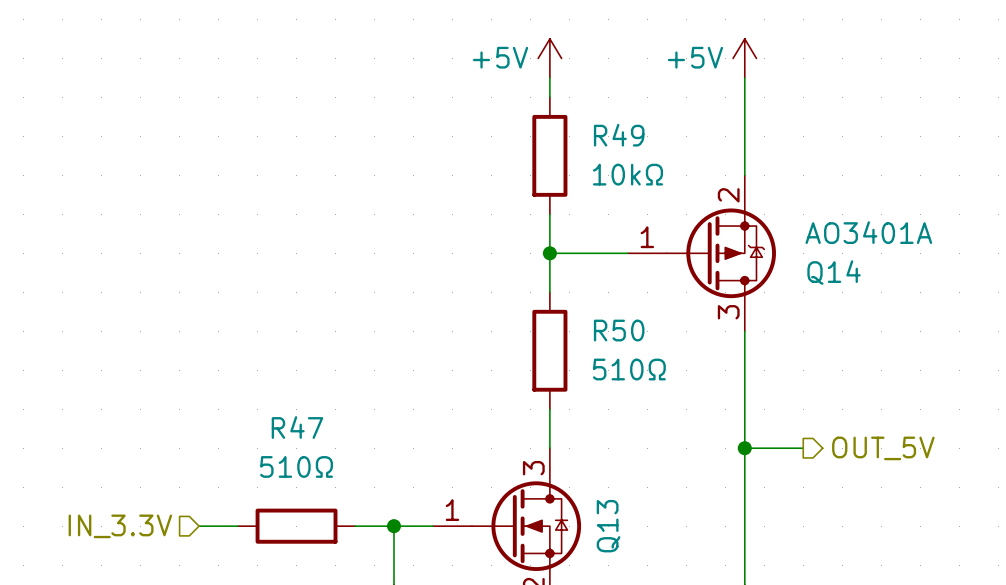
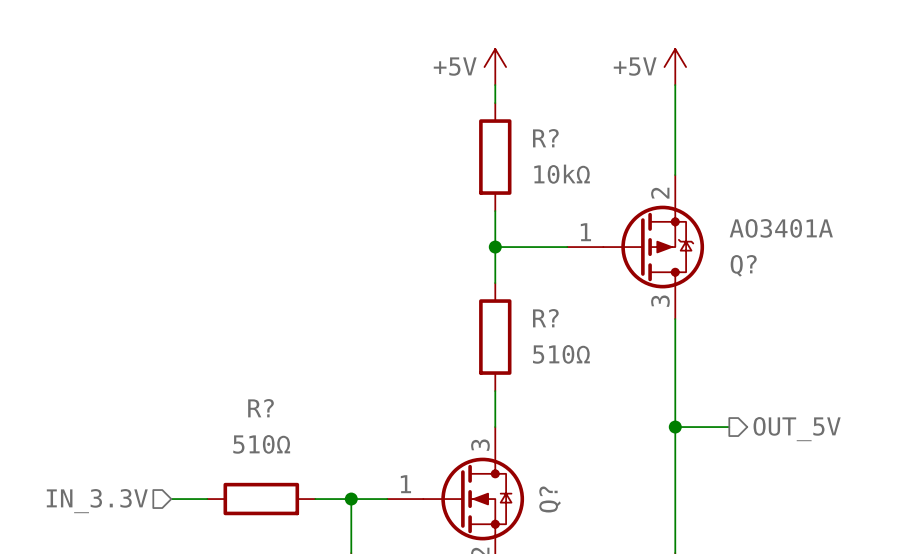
R49 name: R49 (619, 135) -> R? (545, 138)
Q14 name: Q14 (834, 272) -> Q? (743, 265)
R50 name: R50 (619, 330) -> R? (545, 318)
R47 name: R47 (297, 427) -> R? (261, 408)
Q13 name: Q13 (608, 526) -> Q? (550, 499)

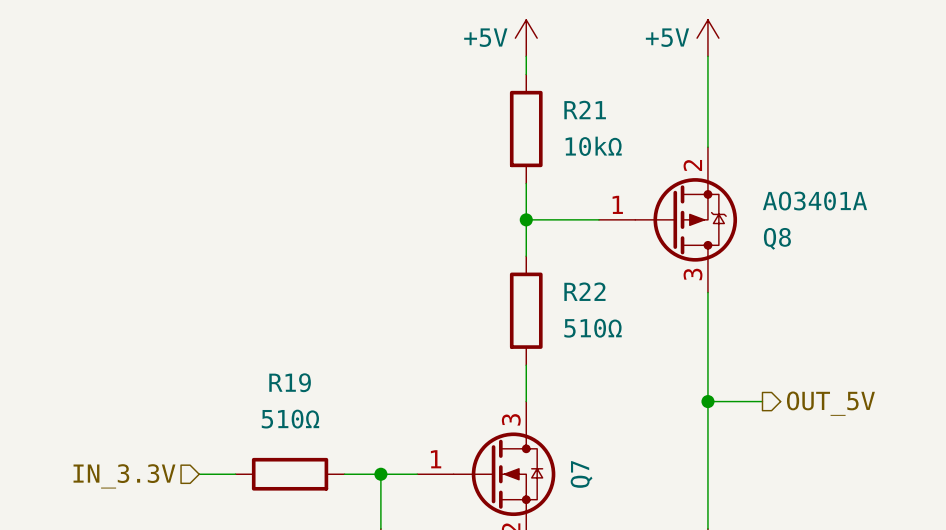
R? name: R? (545, 138) -> R21 (585, 110)
Q? name: Q? (743, 265) -> Q8 (777, 238)
R? name: R? (545, 318) -> R22 (584, 291)
R? name: R? (261, 408) -> R19 (290, 382)
Q? name: Q? (550, 499) -> Q7 (581, 474)

